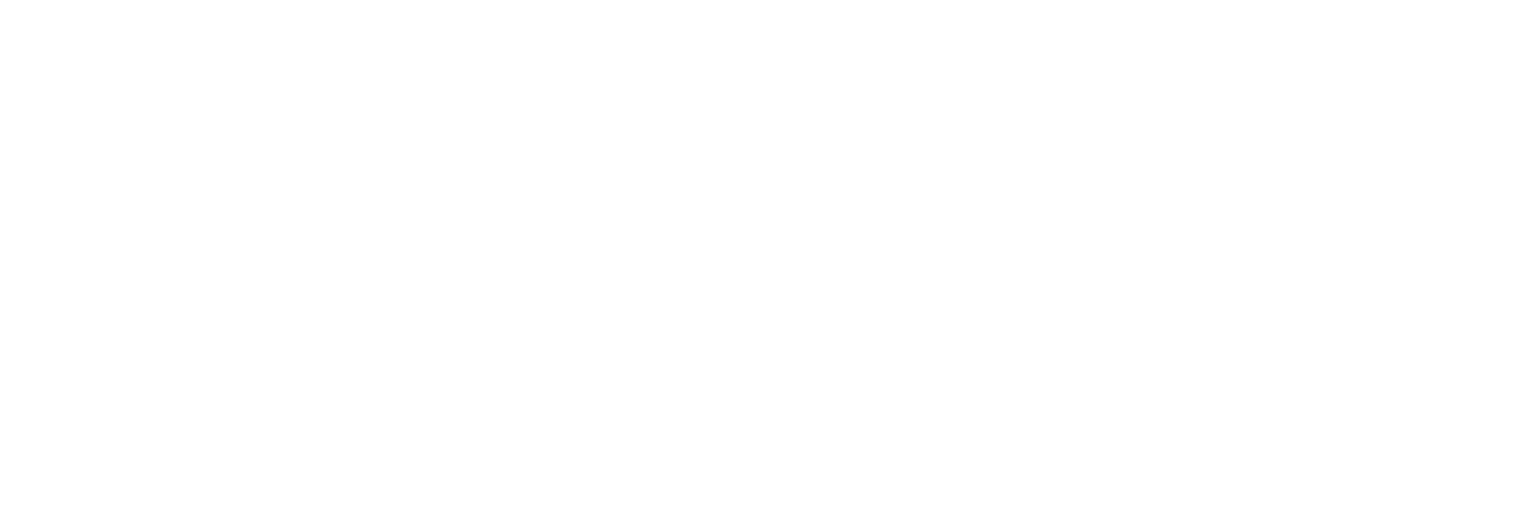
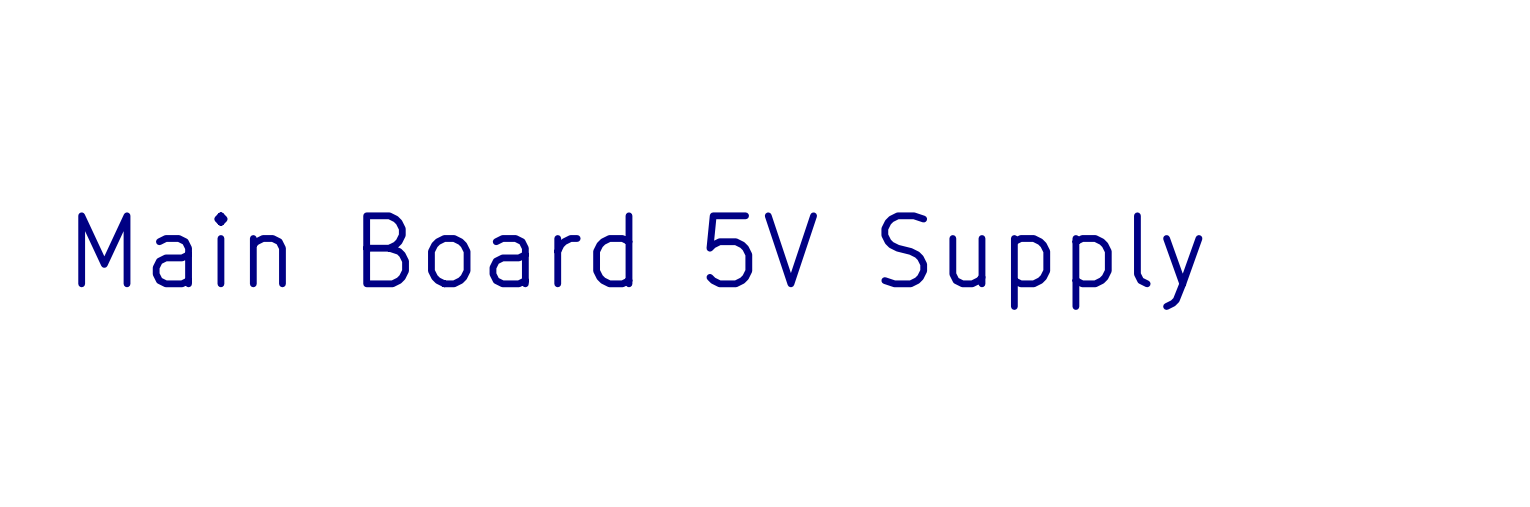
text: none -> Main Board 5V Supply (640, 261)

